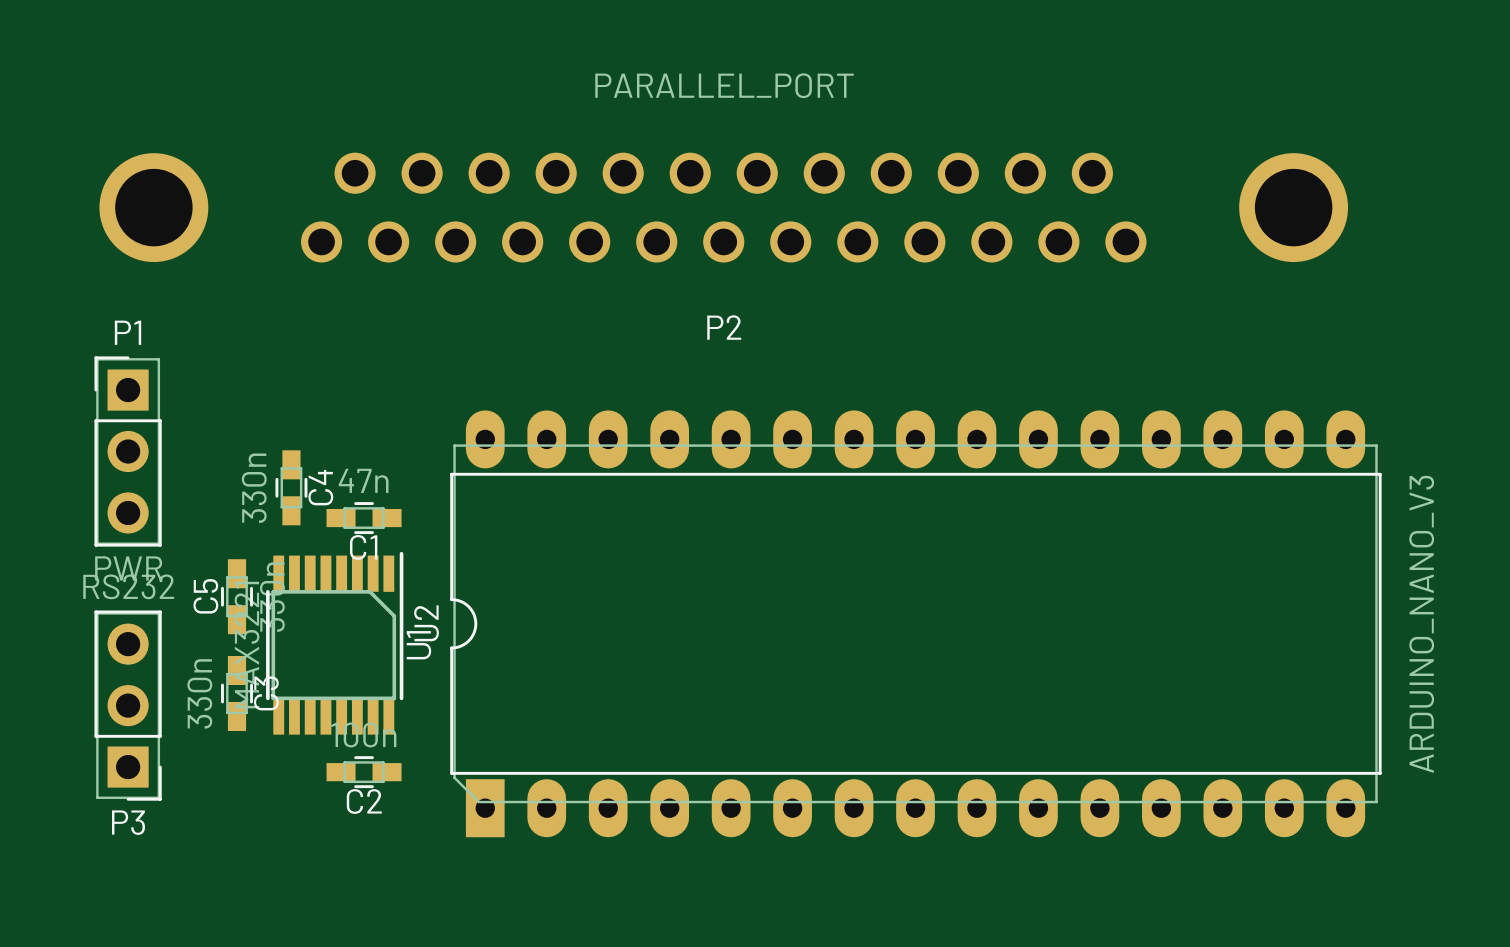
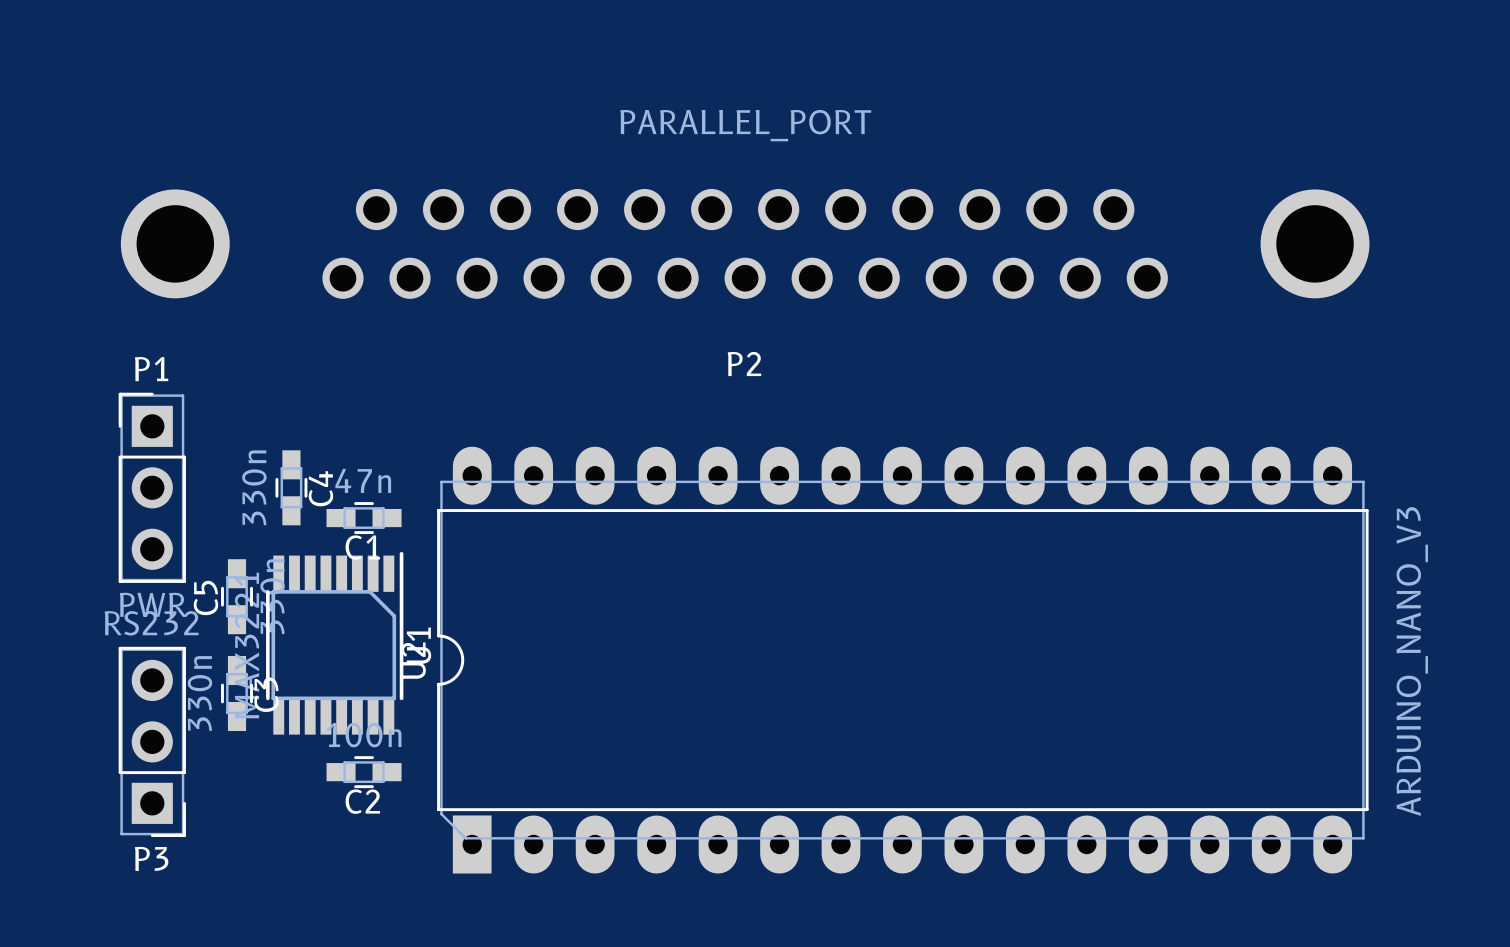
P2 position: (723, 207) -> (745, 243)
P1 position: (128, 451) -> (152, 487)
U2 position: (915, 623) -> (902, 660)
P3 position: (128, 705) -> (152, 741)

